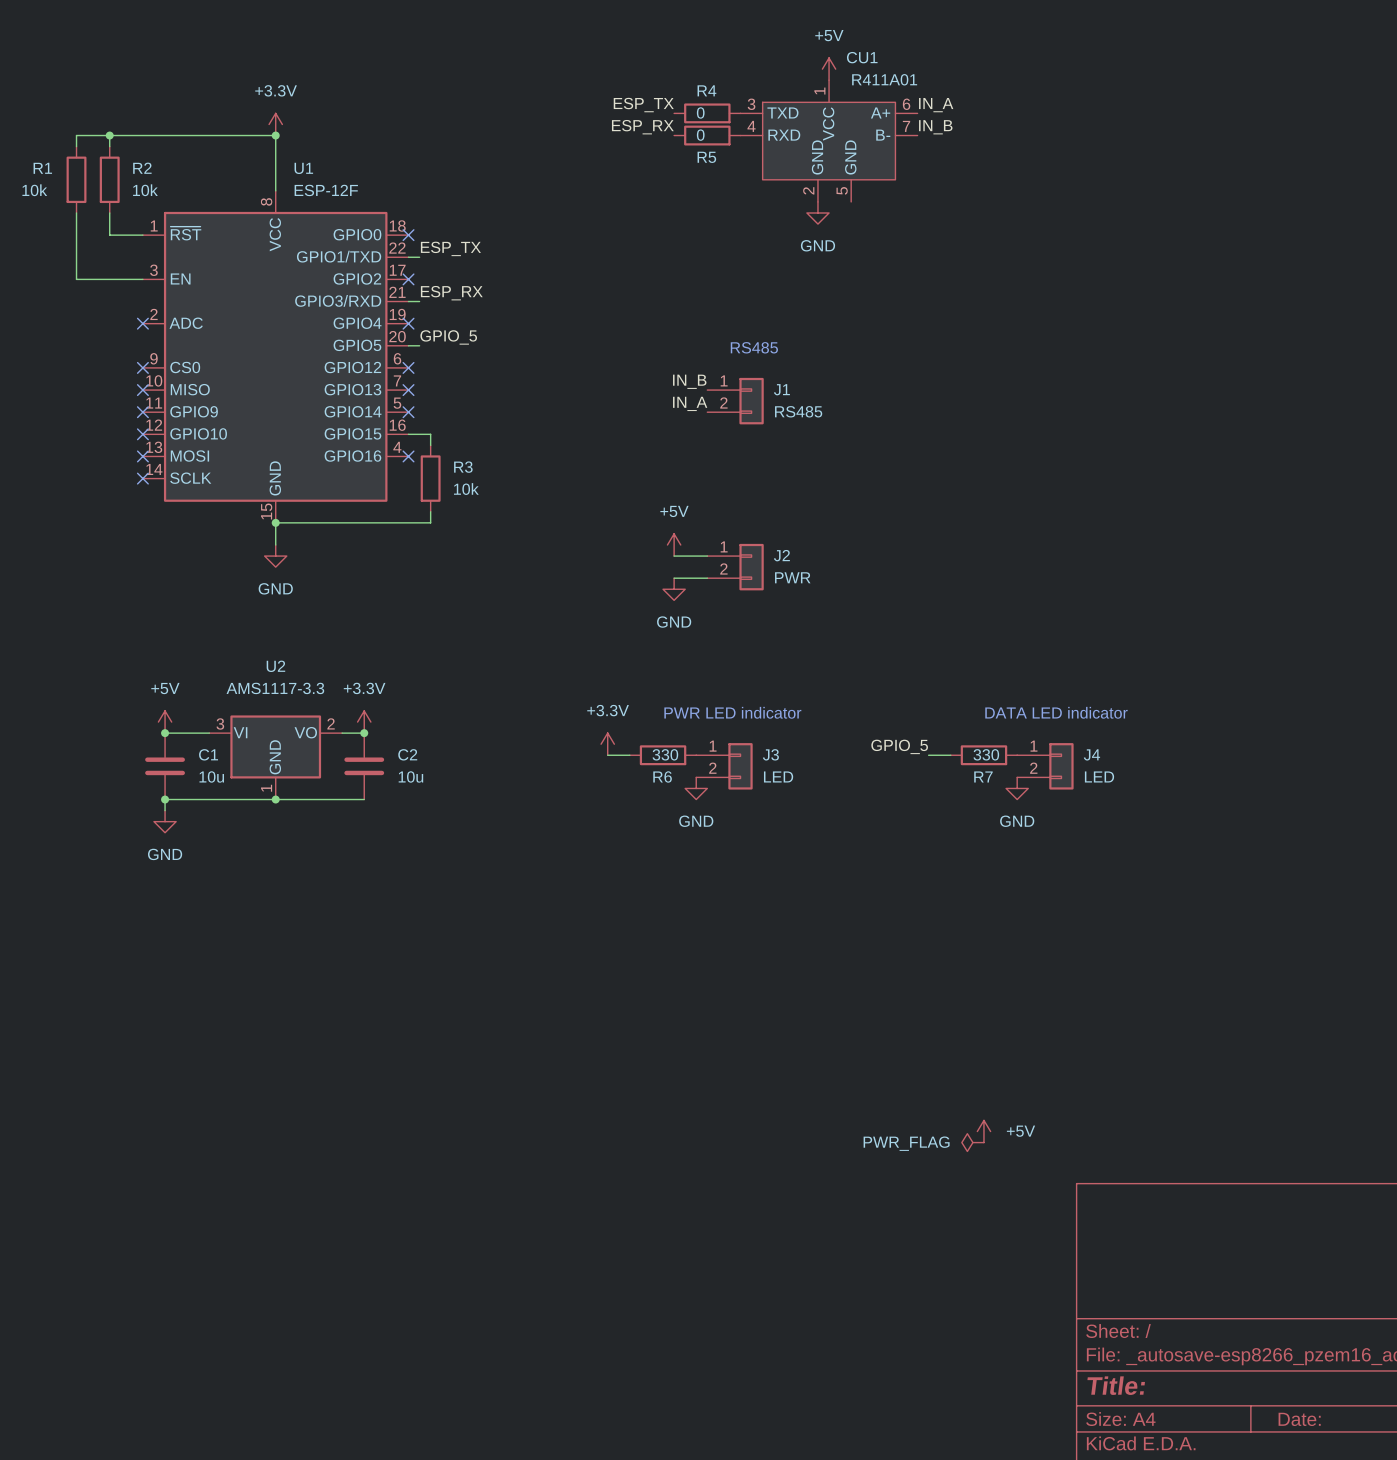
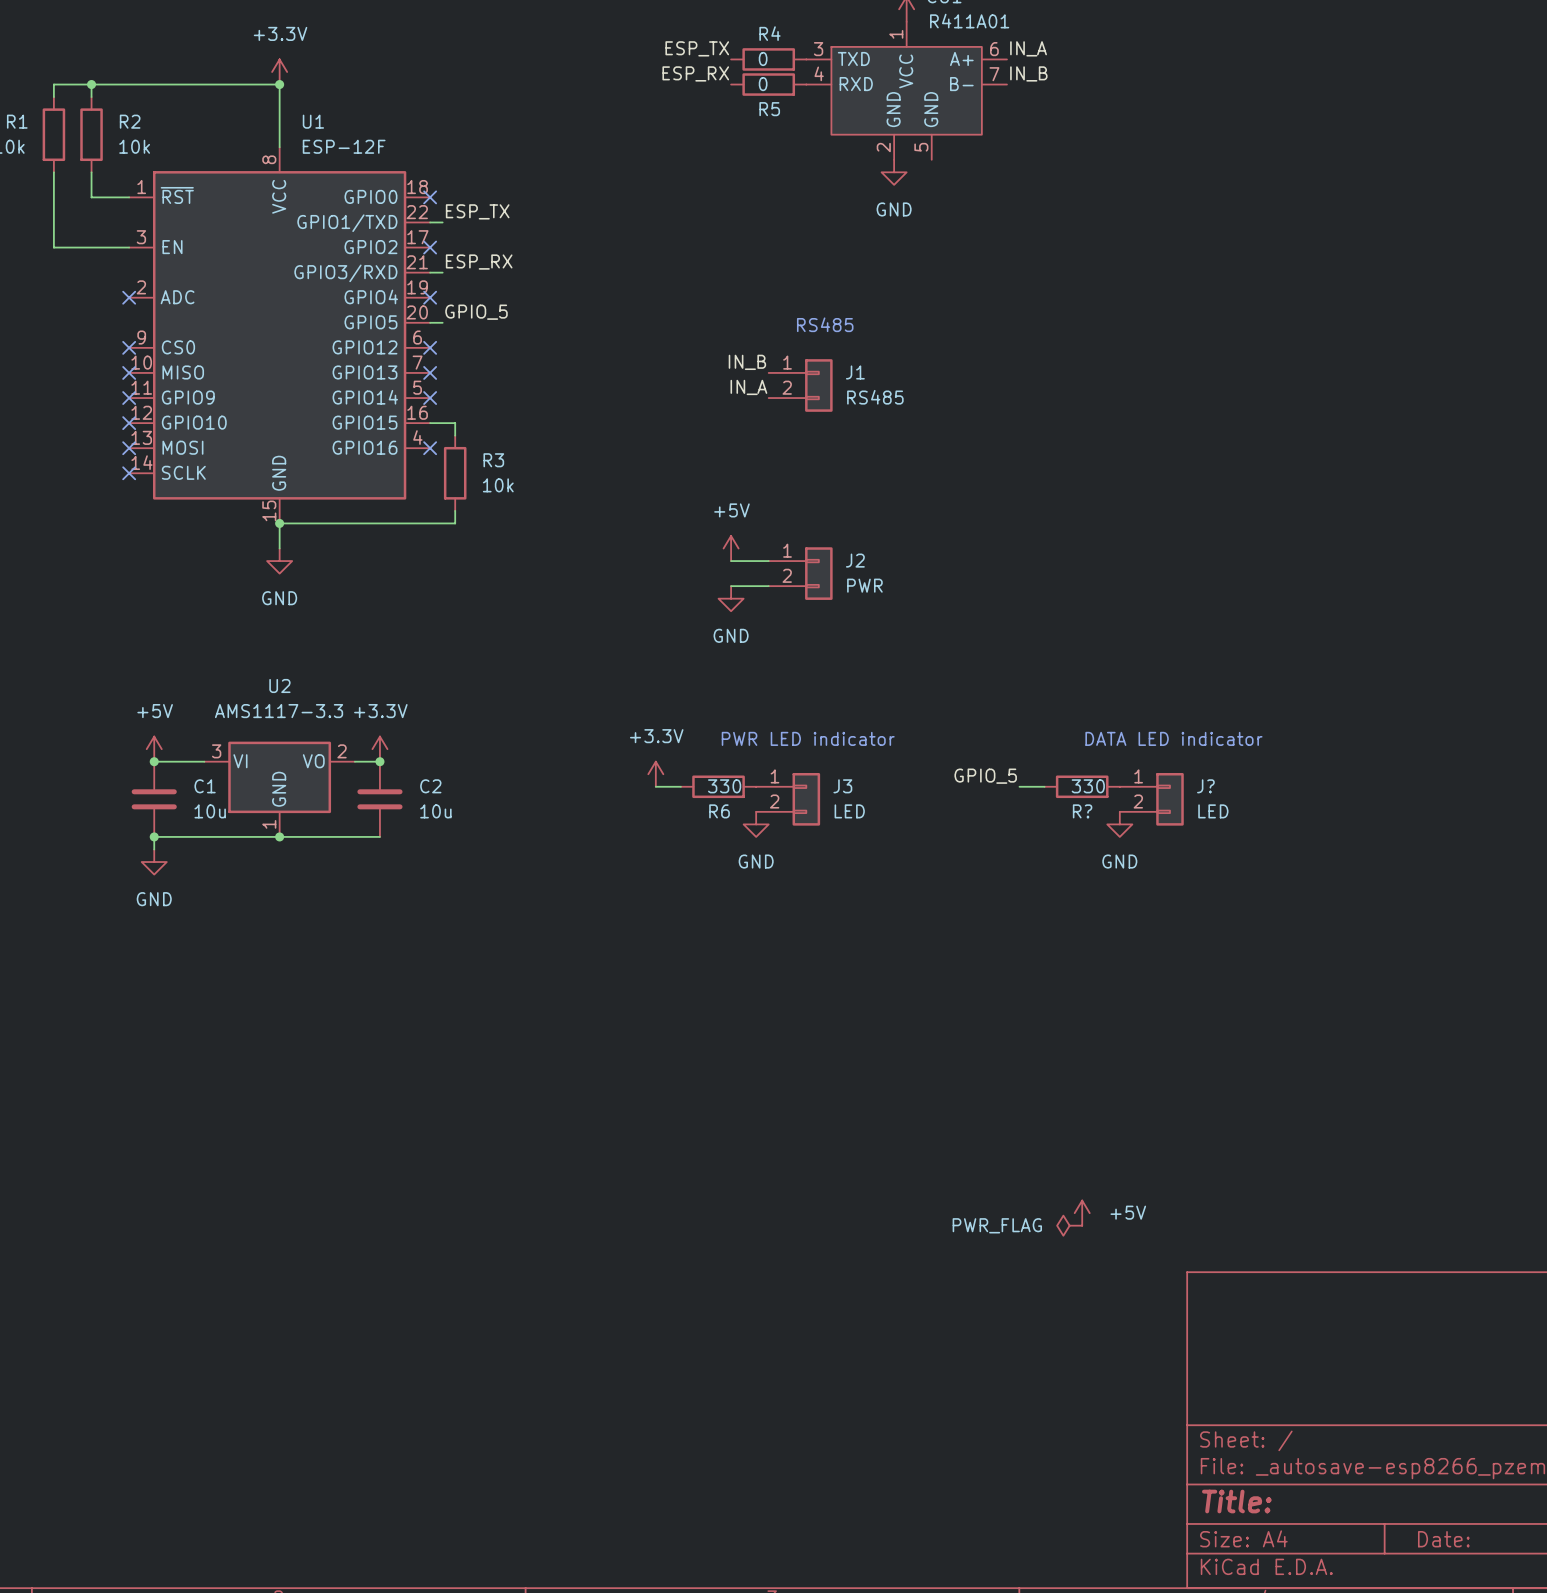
J4 name: J4 (1091, 754) -> J? (1205, 786)
R7 name: R7 (983, 776) -> R? (1082, 811)

